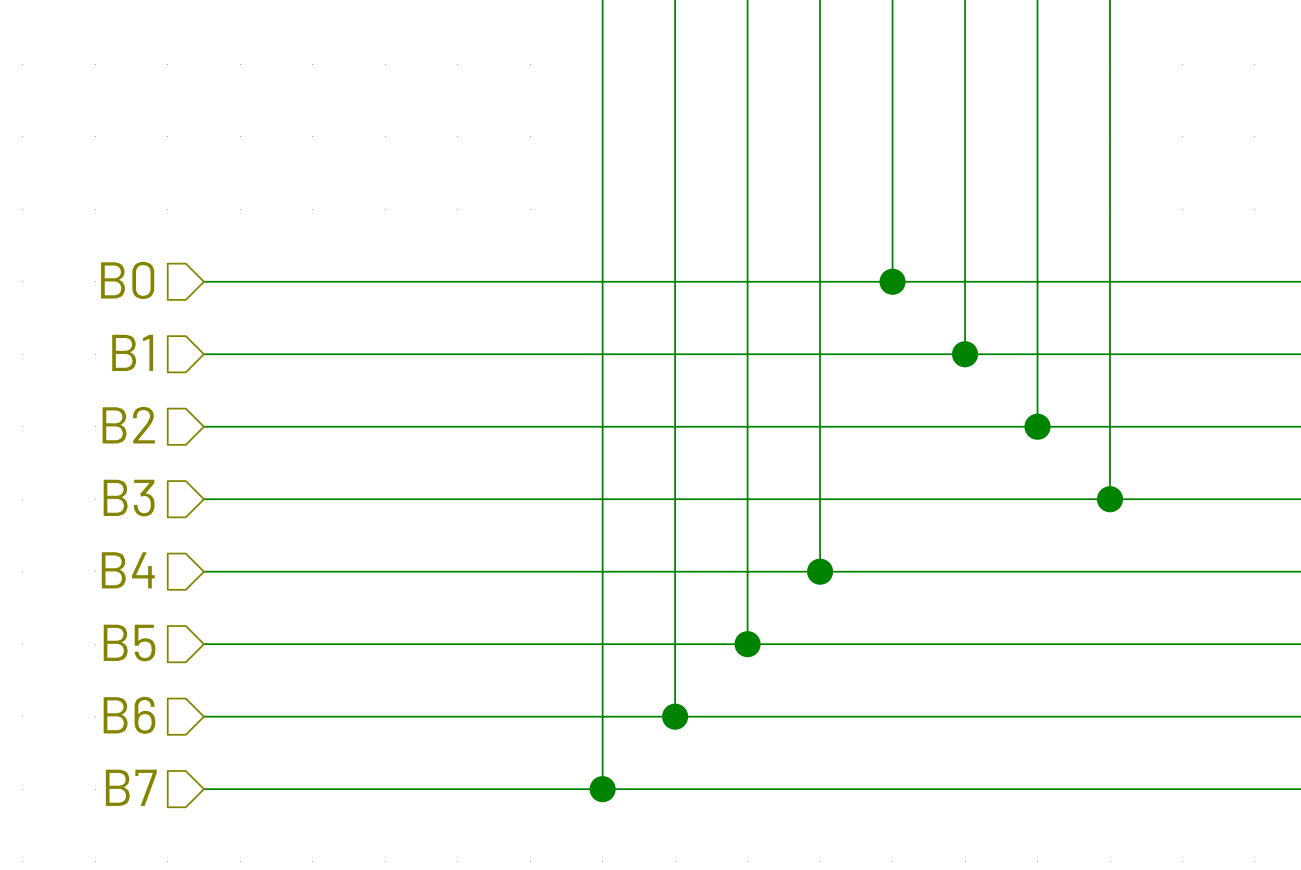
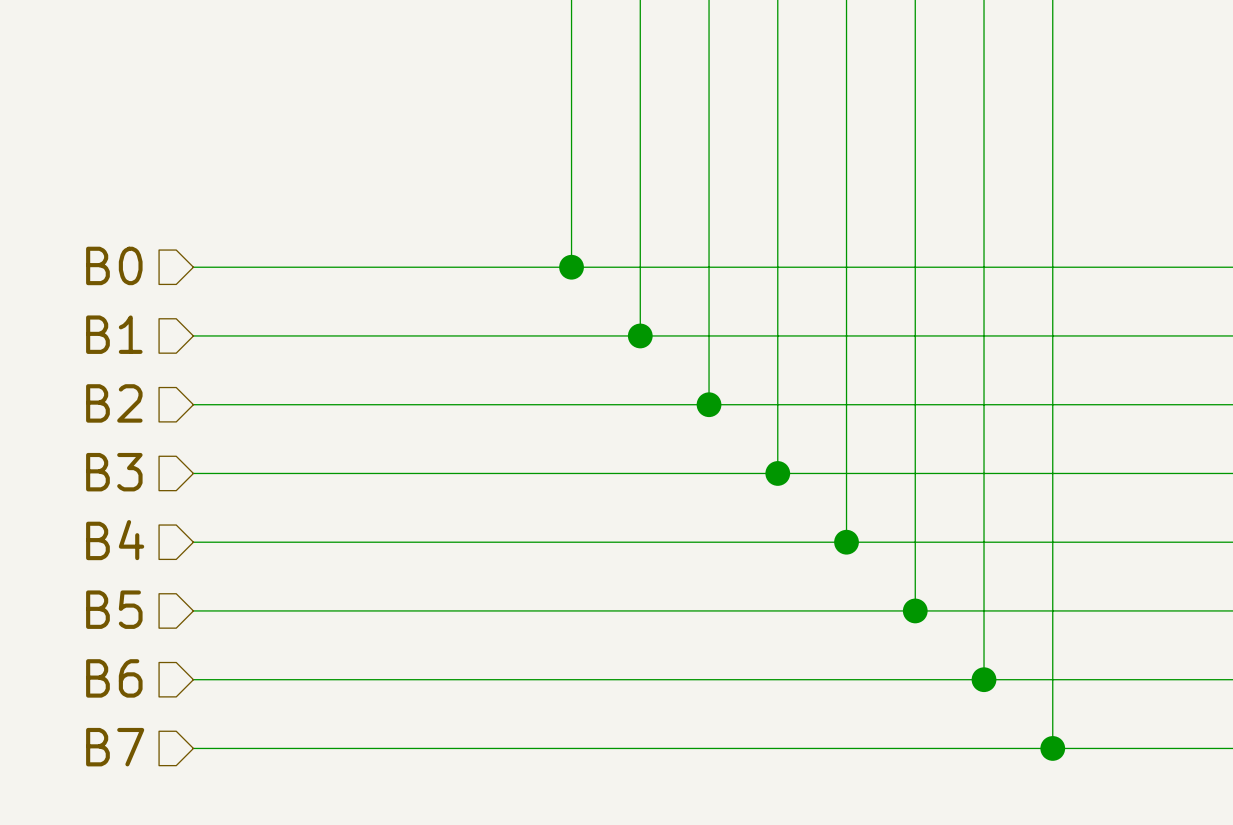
wire: (602, 281) (602, 789) -> none
junction: none -> (571, 267)
wire: none -> (846, 267) (846, 542)
junction: (892, 281) -> none
wire: (675, 354) (675, 716) -> none
junction: none -> (640, 335)
wire: none -> (915, 335) (915, 610)
junction: (965, 354) -> none
wire: (747, 426) (747, 644) -> none
junction: none -> (709, 404)
wire: none -> (984, 404) (984, 679)
junction: (1037, 426) -> none
wire: (820, 499) (820, 571) -> none
junction: none -> (777, 473)
wire: none -> (1052, 473) (1052, 748)
junction: (1110, 499) -> none
junction: (820, 571) -> none
junction: none -> (846, 542)
junction: (747, 644) -> none
junction: none -> (915, 610)
junction: (675, 716) -> none
junction: none -> (984, 679)
junction: (602, 789) -> none
junction: none -> (1052, 748)

